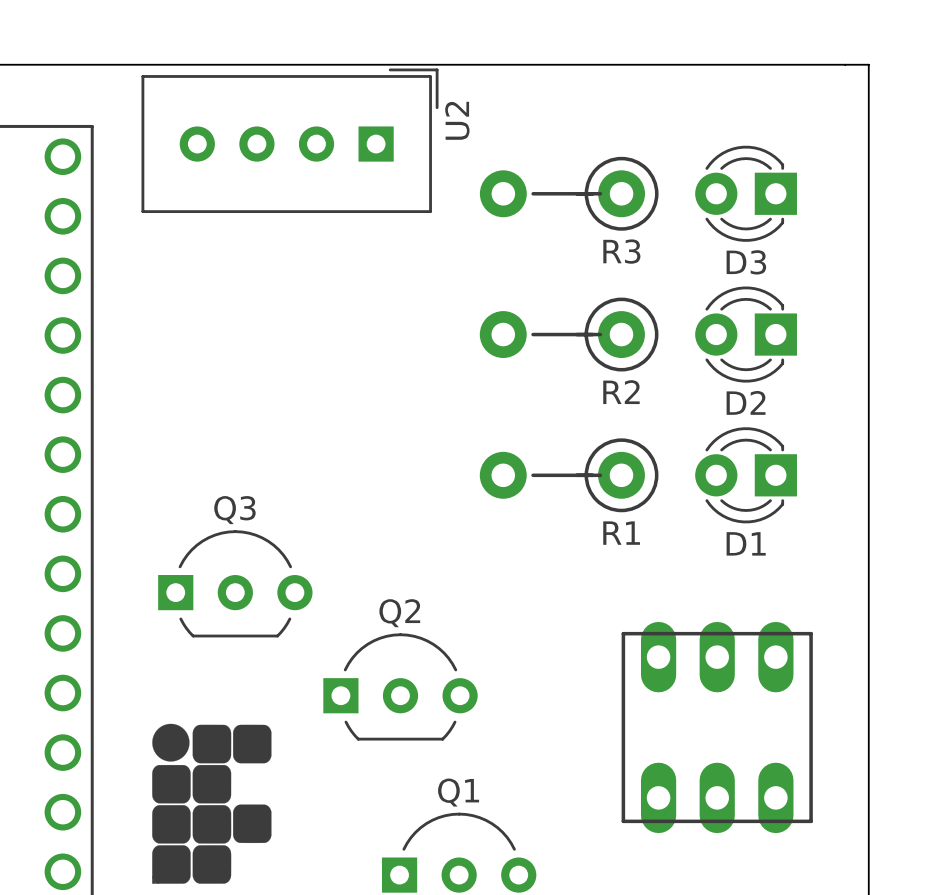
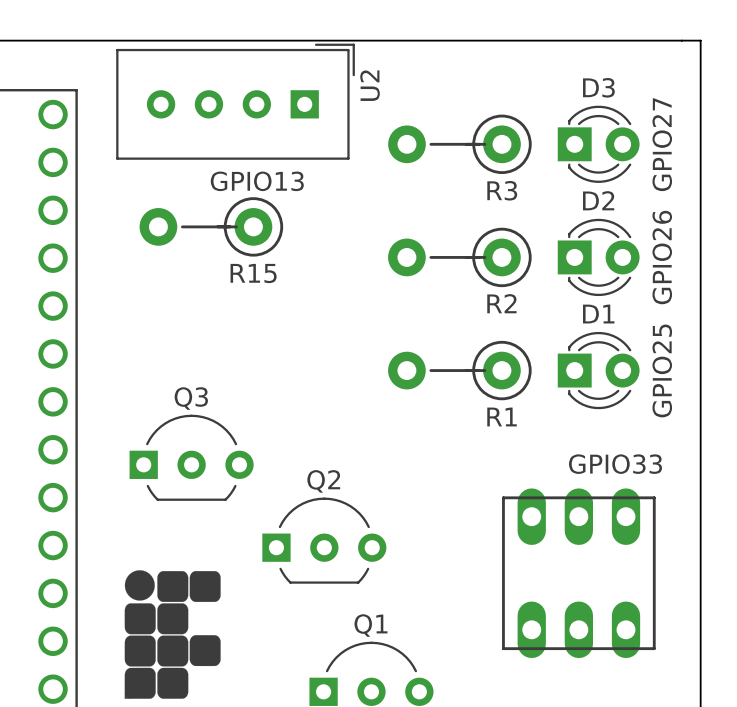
D3 rotation: 0° (746, 193) -> 180° (598, 144)
text: none -> GPIO27 (662, 144)
text: none -> GPIO13 (257, 181)
R15: none -> (211, 226)
D2 rotation: 0° (746, 334) -> 180° (598, 257)
text: none -> GPIO26 (662, 257)
D1 rotation: 0° (746, 475) -> 180° (598, 370)
text: none -> GPIO25 (662, 370)
text: none -> GPIO33 (615, 464)

